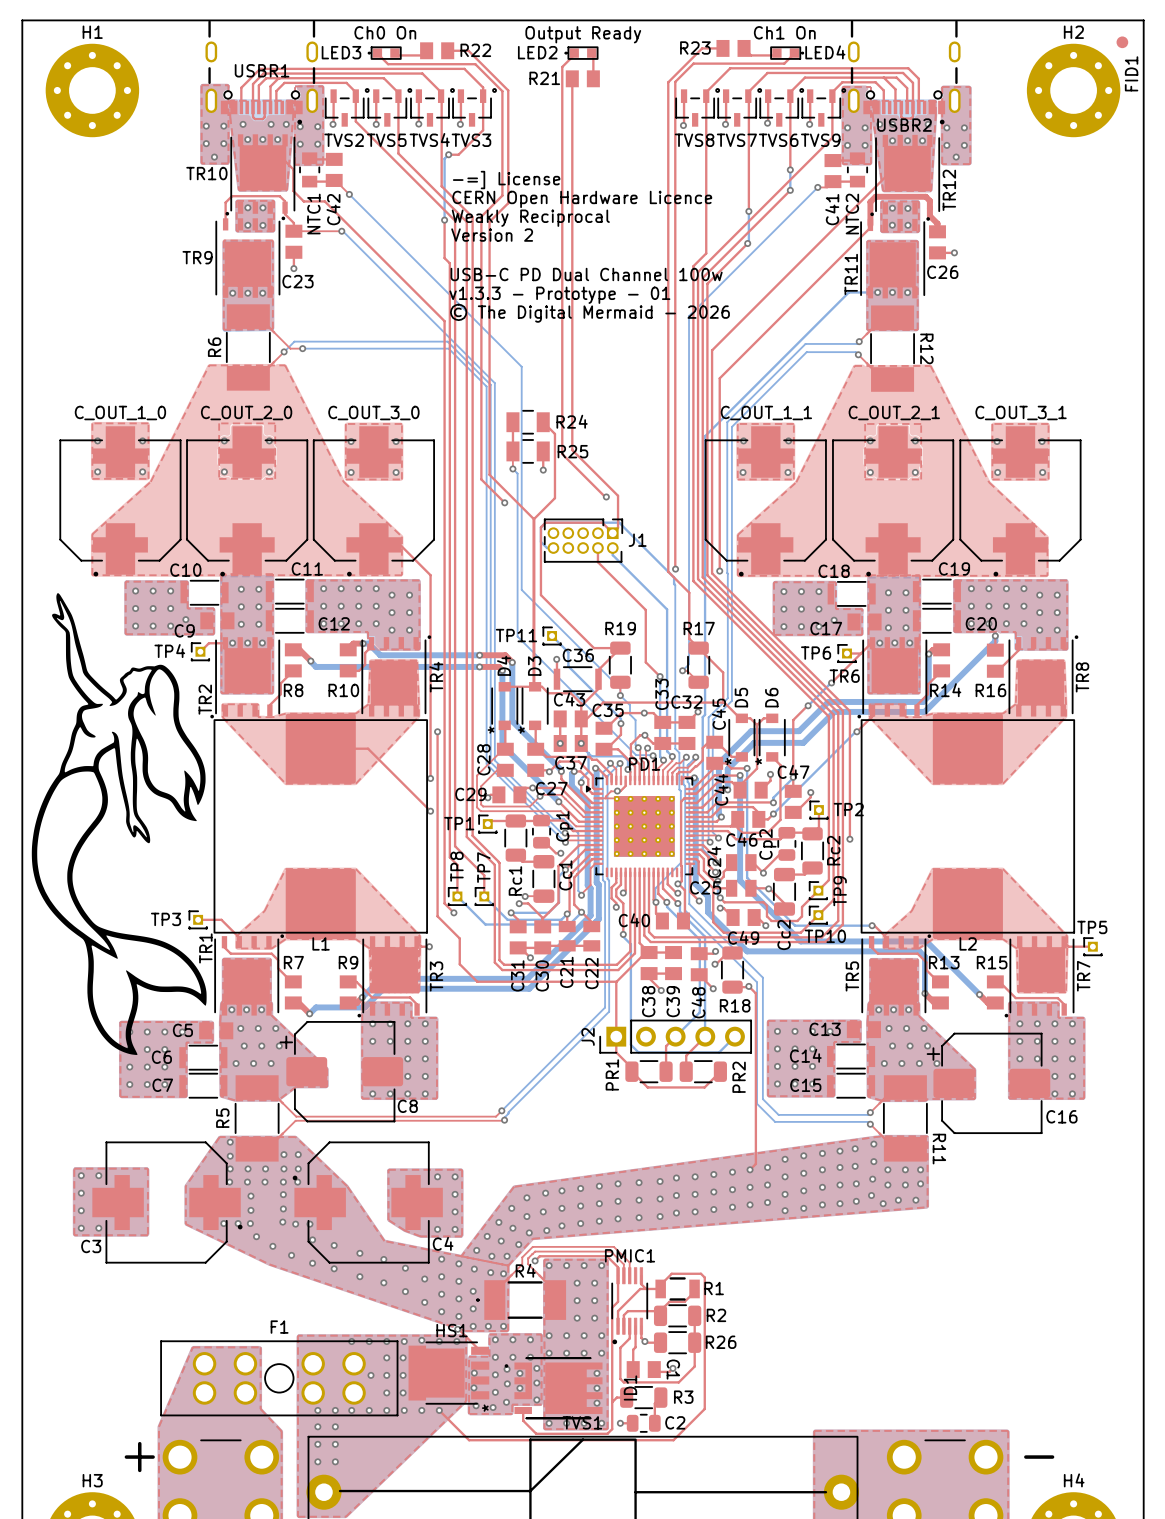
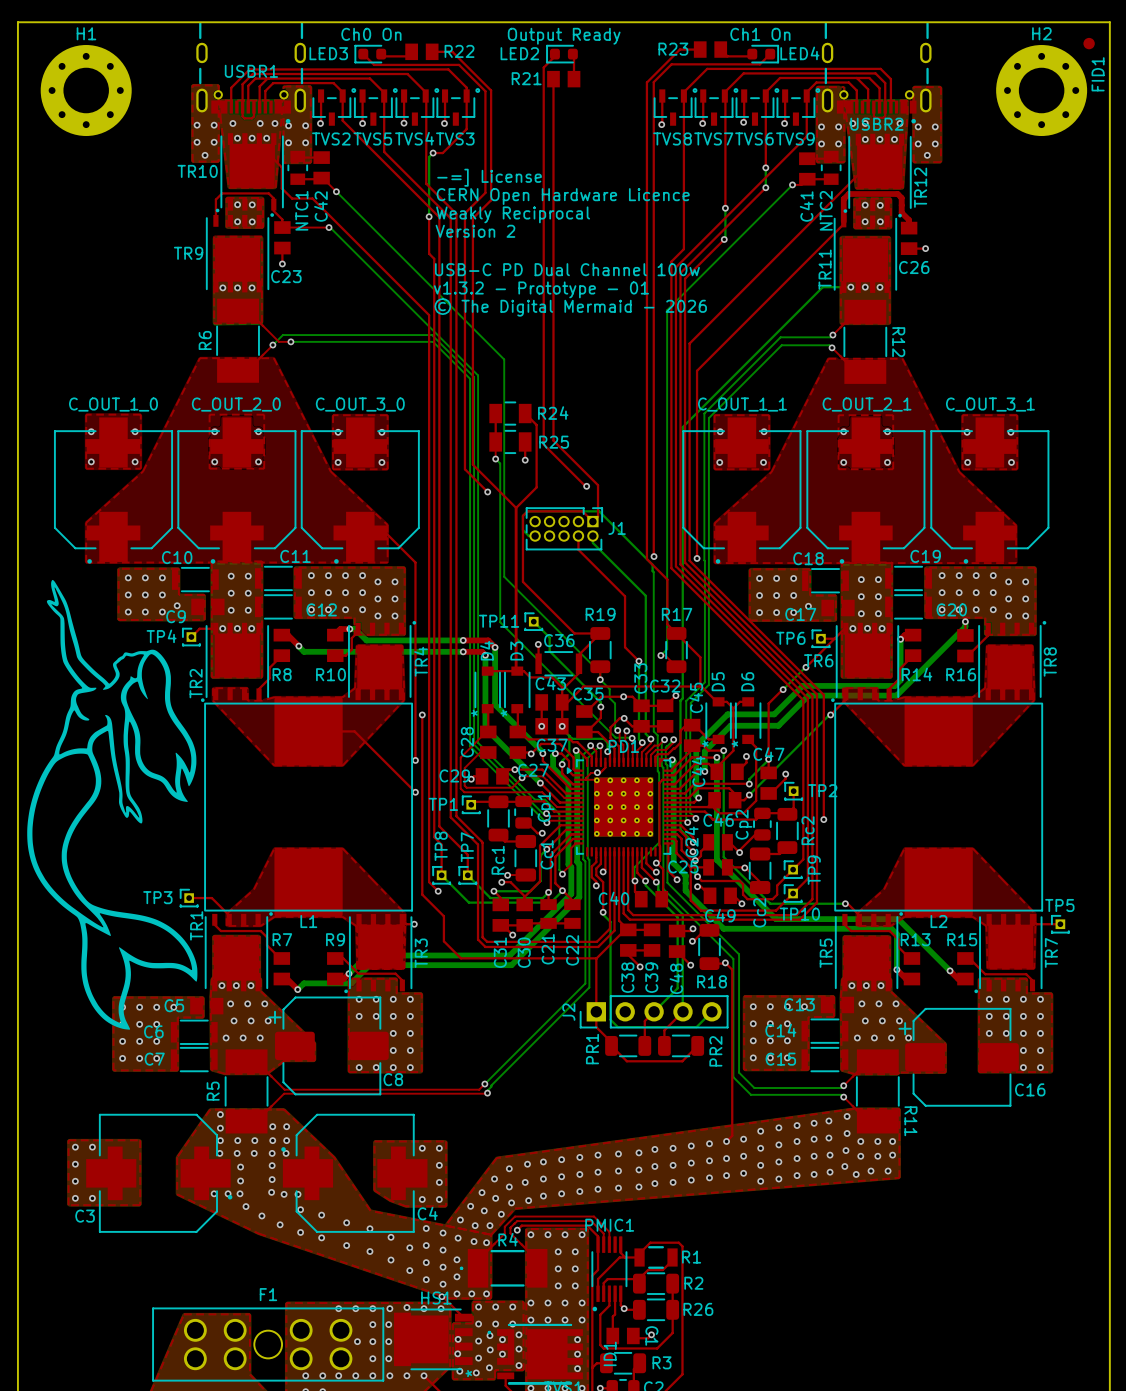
LED3 footprint: [368, 46, 402, 60] -> [354, 45, 387, 64]
LED2 footprint: [564, 46, 599, 60] -> [546, 45, 578, 64]
LED4 footprint: [770, 46, 804, 60] -> [747, 45, 779, 64]
text: v1.3.3 - Prototype - 01 (559, 295) -> v1.3.2 - Prototype - 01 (541, 289)

